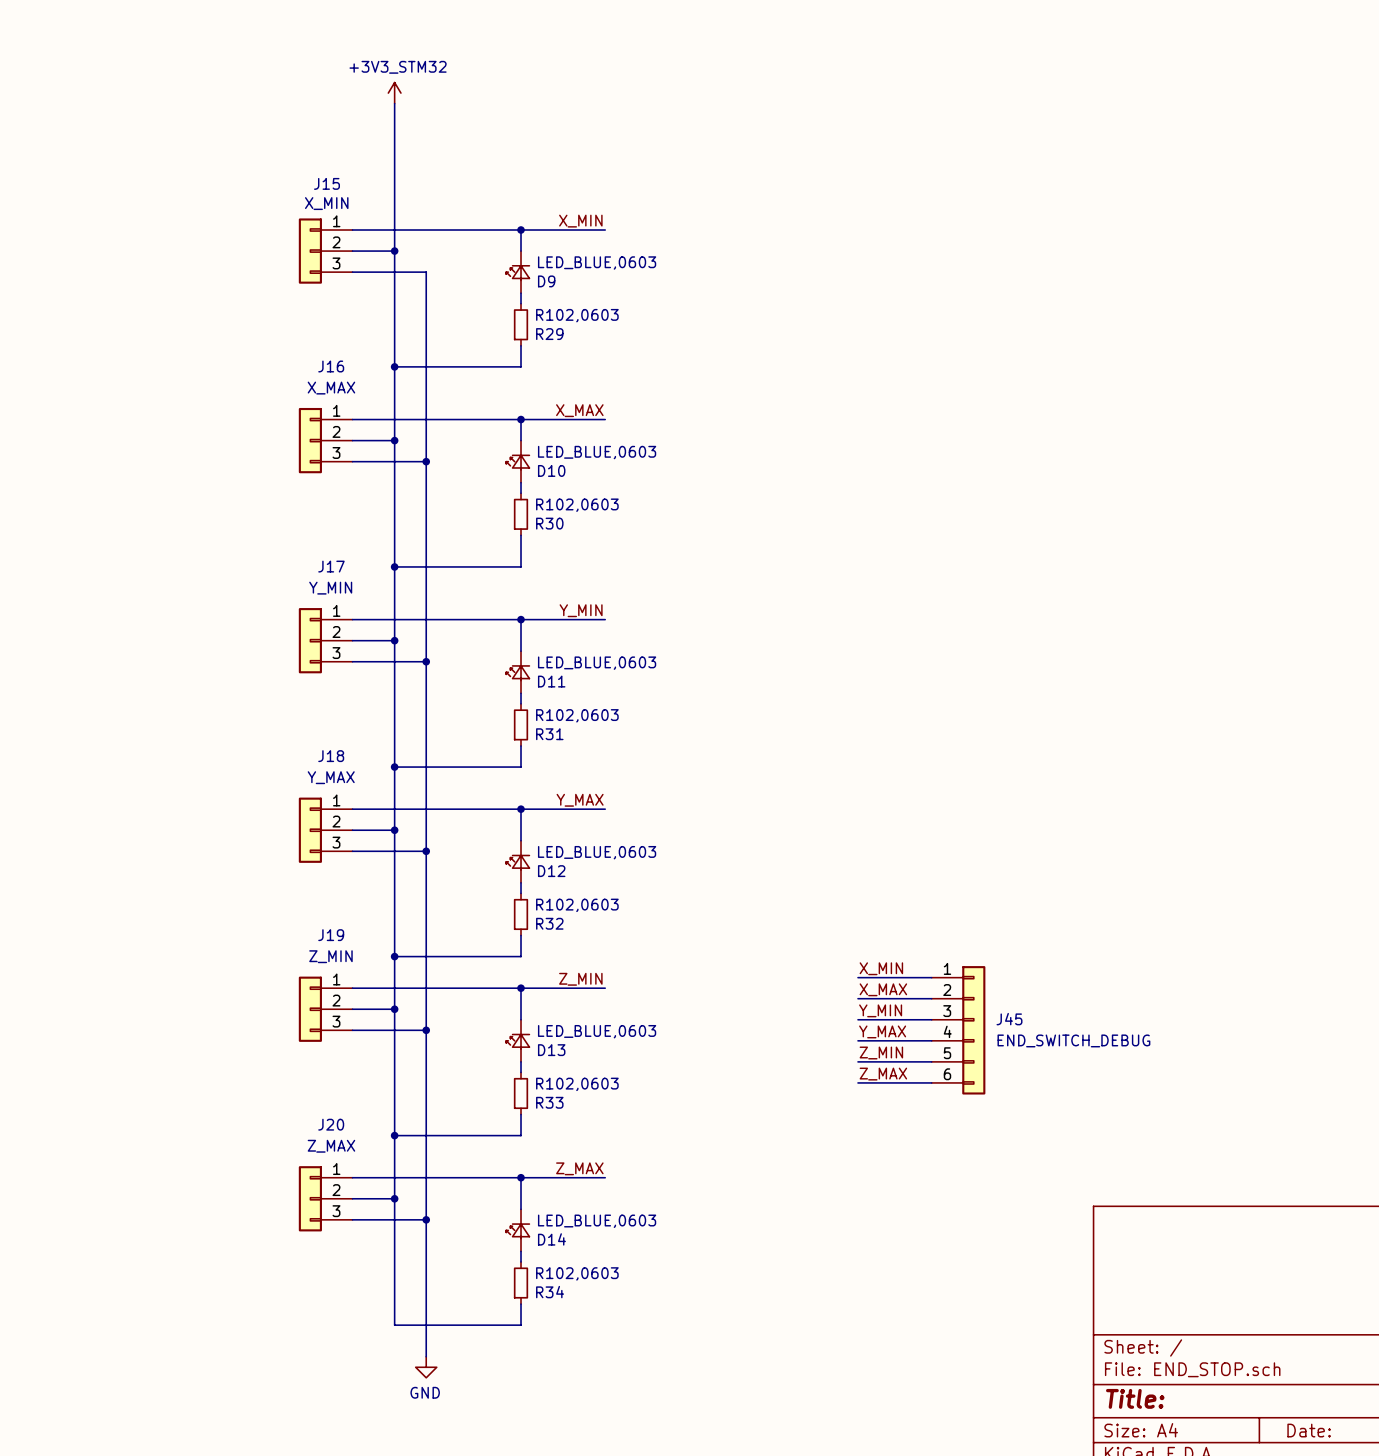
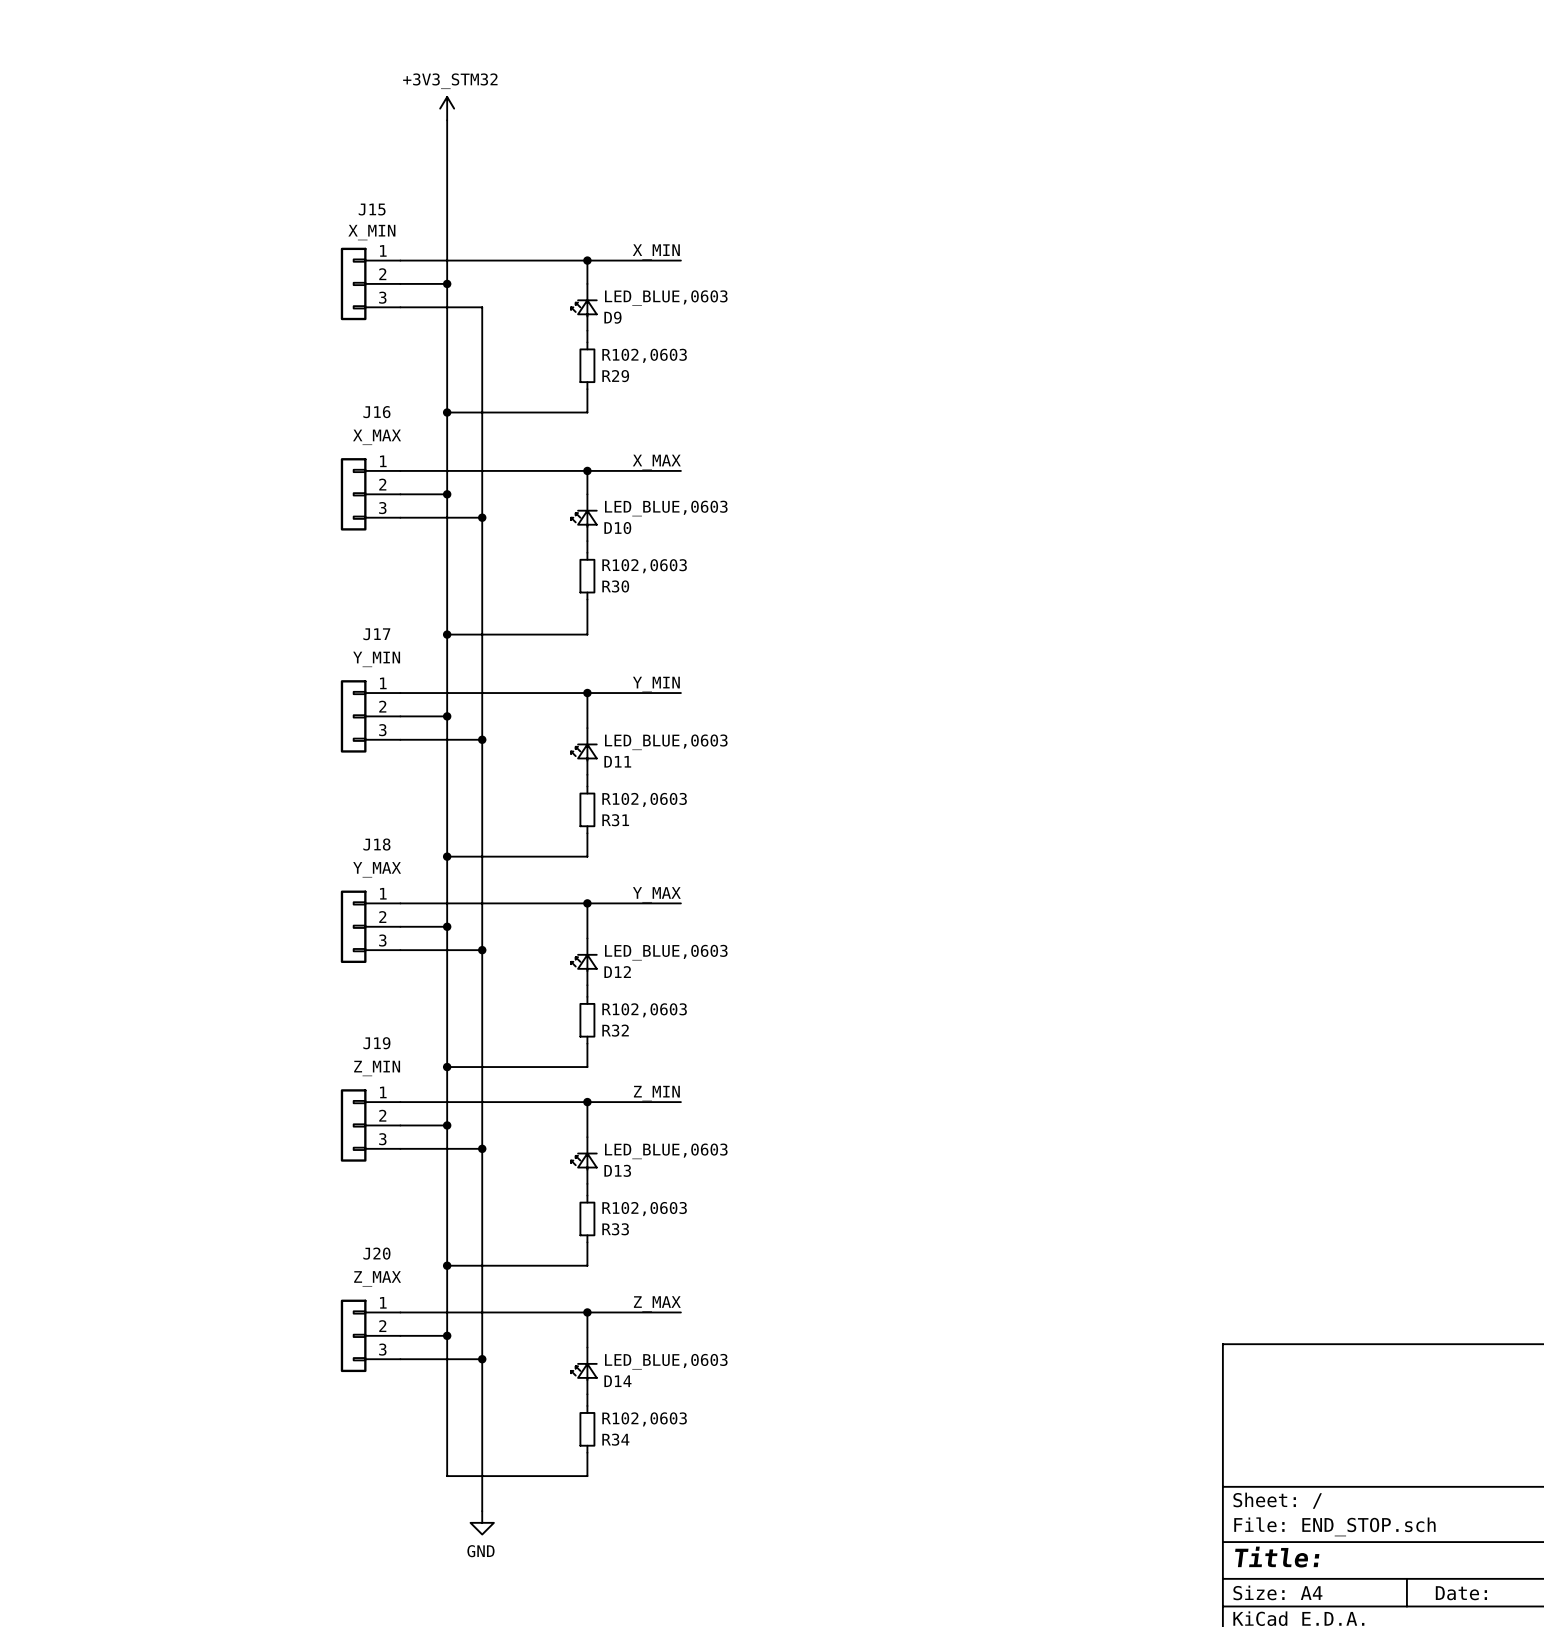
label: X_MIN (881, 968) -> none
wire: (857, 977) (931, 977) -> none
label: X_MAX (883, 989) -> none
wire: (857, 998) (931, 998) -> none
label: Y_MIN (880, 1010) -> none
wire: (857, 1019) (931, 1019) -> none
J45: END_SWITCH_DEBUG (958, 1030) -> none
label: Y_MAX (882, 1031) -> none
wire: (857, 1040) (931, 1040) -> none
label: Z_MIN (881, 1053) -> none
wire: (857, 1061) (931, 1061) -> none
label: Z_MAX (883, 1074) -> none
wire: (857, 1082) (931, 1082) -> none

